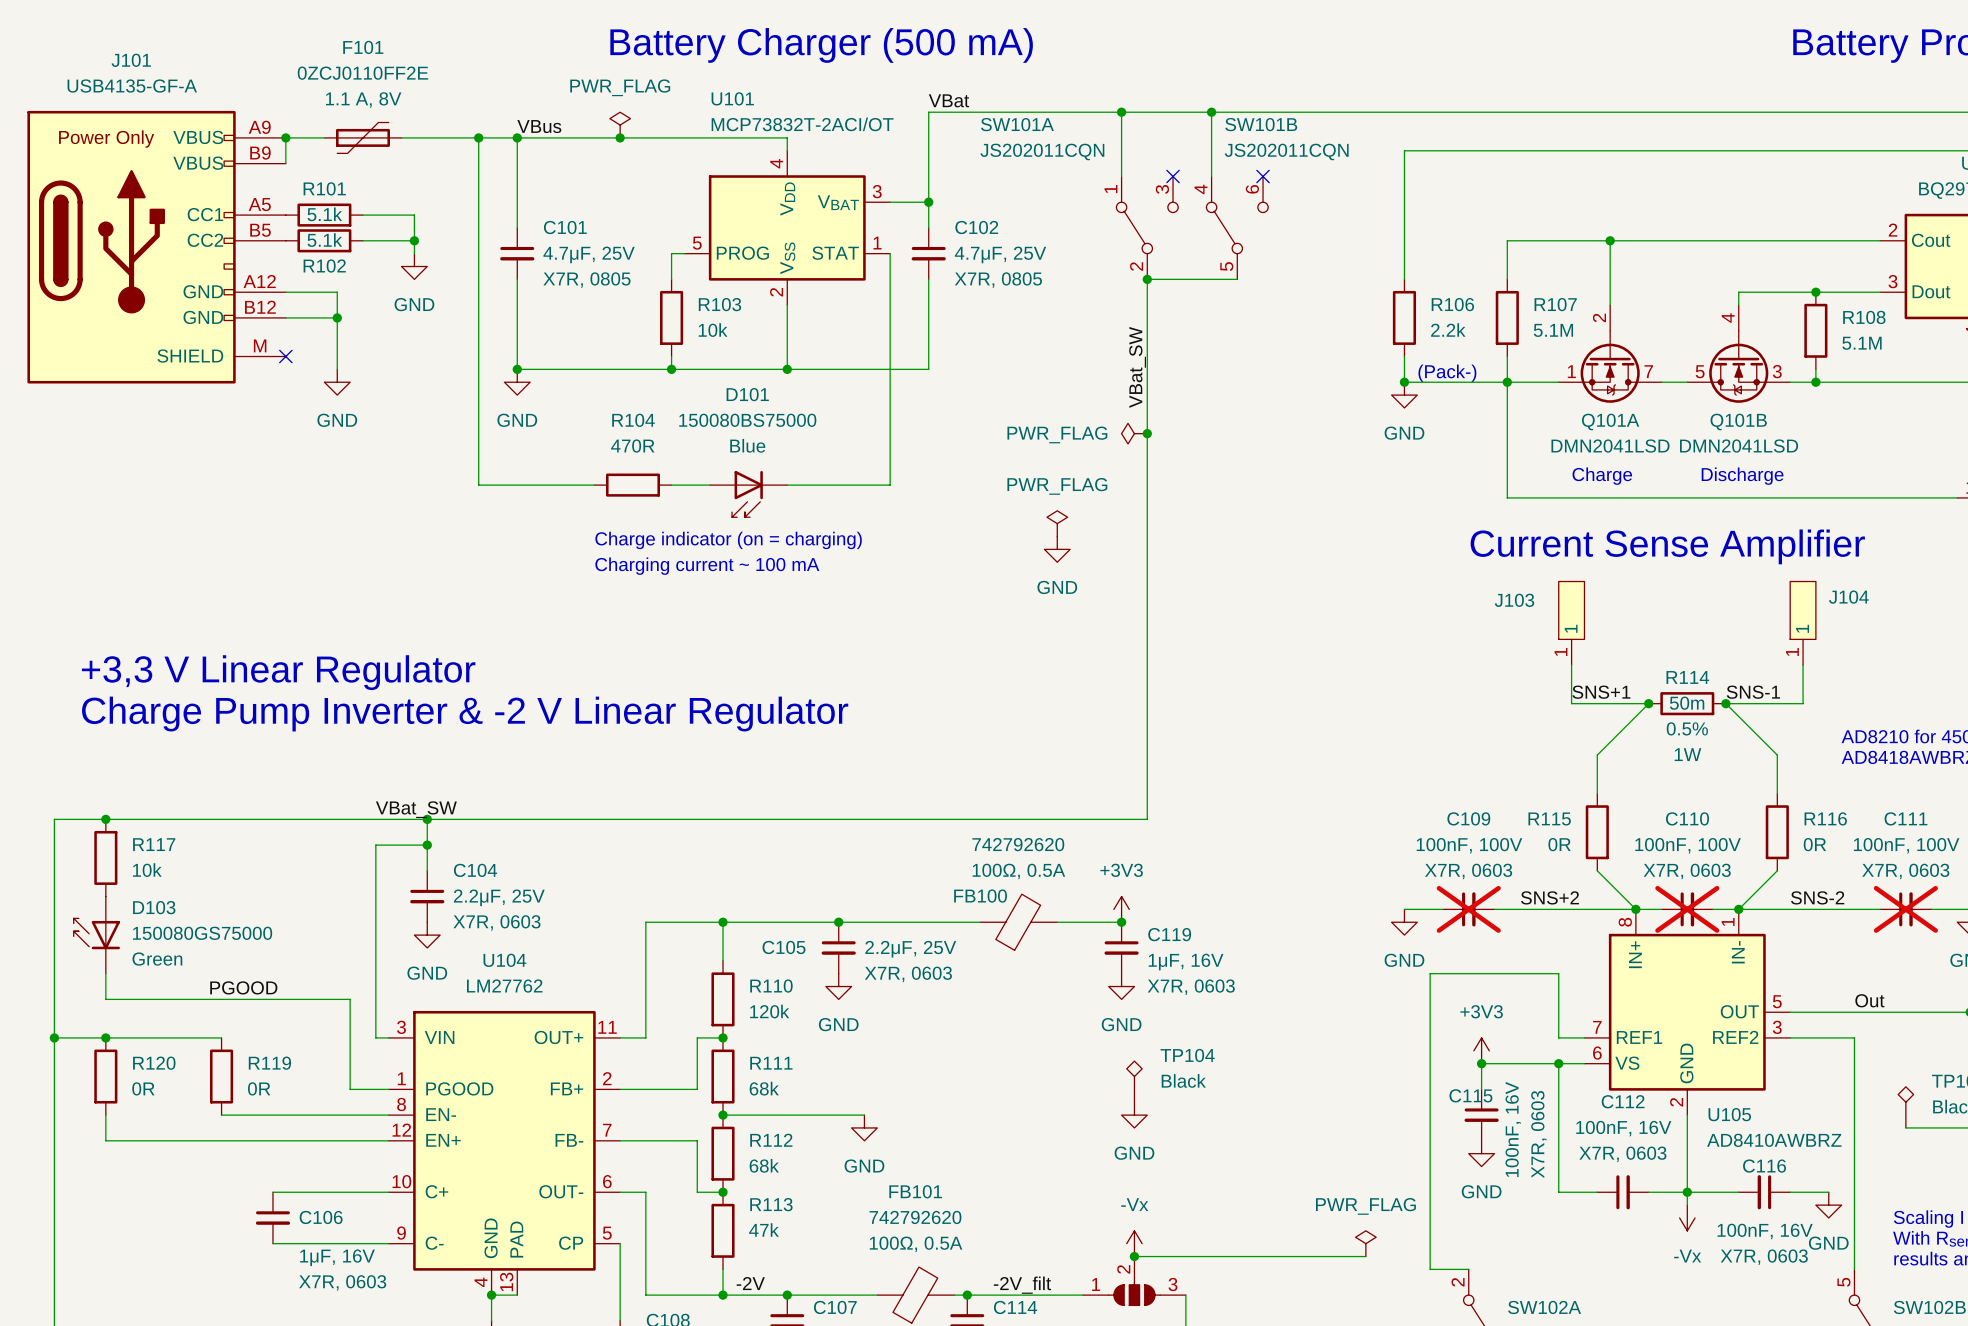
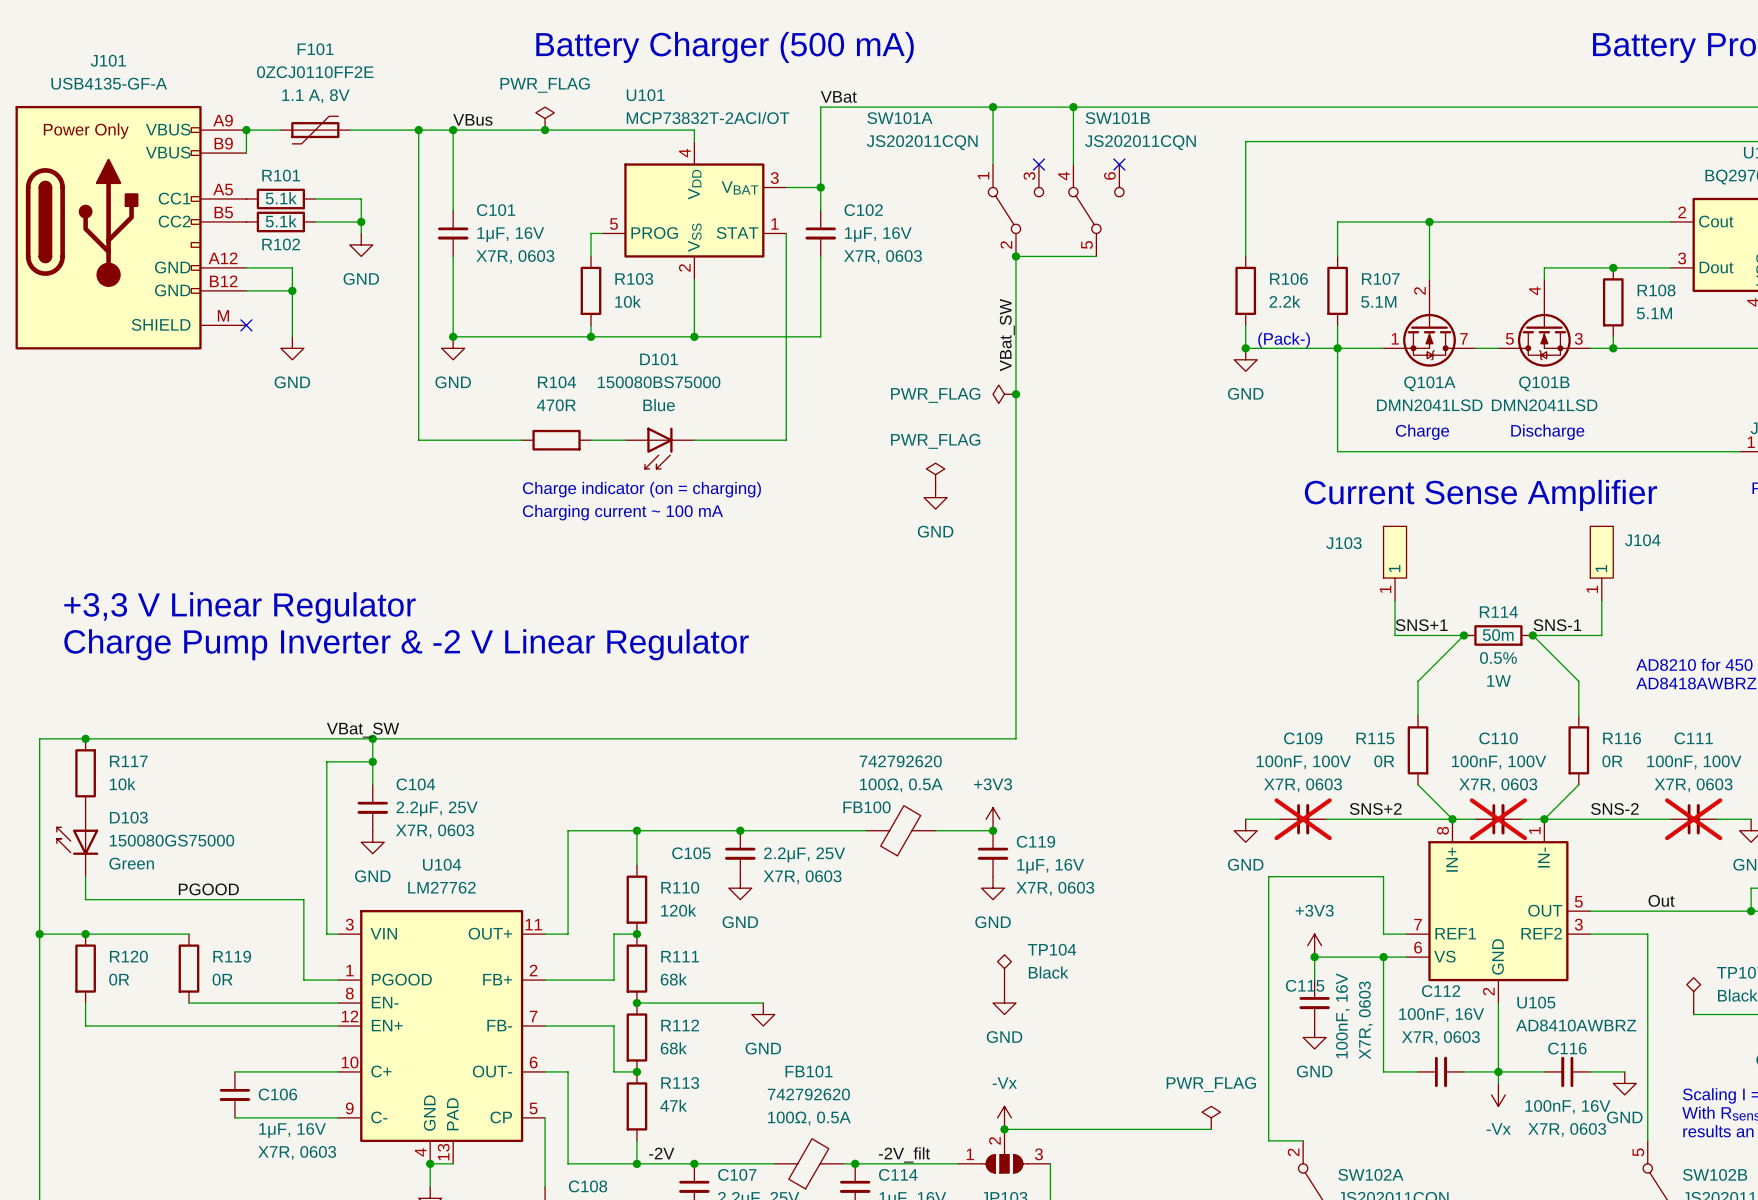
C101 text: 4.7μF, 25V (589, 254) -> 1μF, 16V (510, 234)
C102 text: 4.7μF, 25V (1000, 254) -> 1μF, 16V (878, 234)
C101 text: X7R, 0805 (586, 280) -> X7R, 0603 (515, 257)
C102 text: X7R, 0805 (998, 280) -> X7R, 0603 (882, 257)

